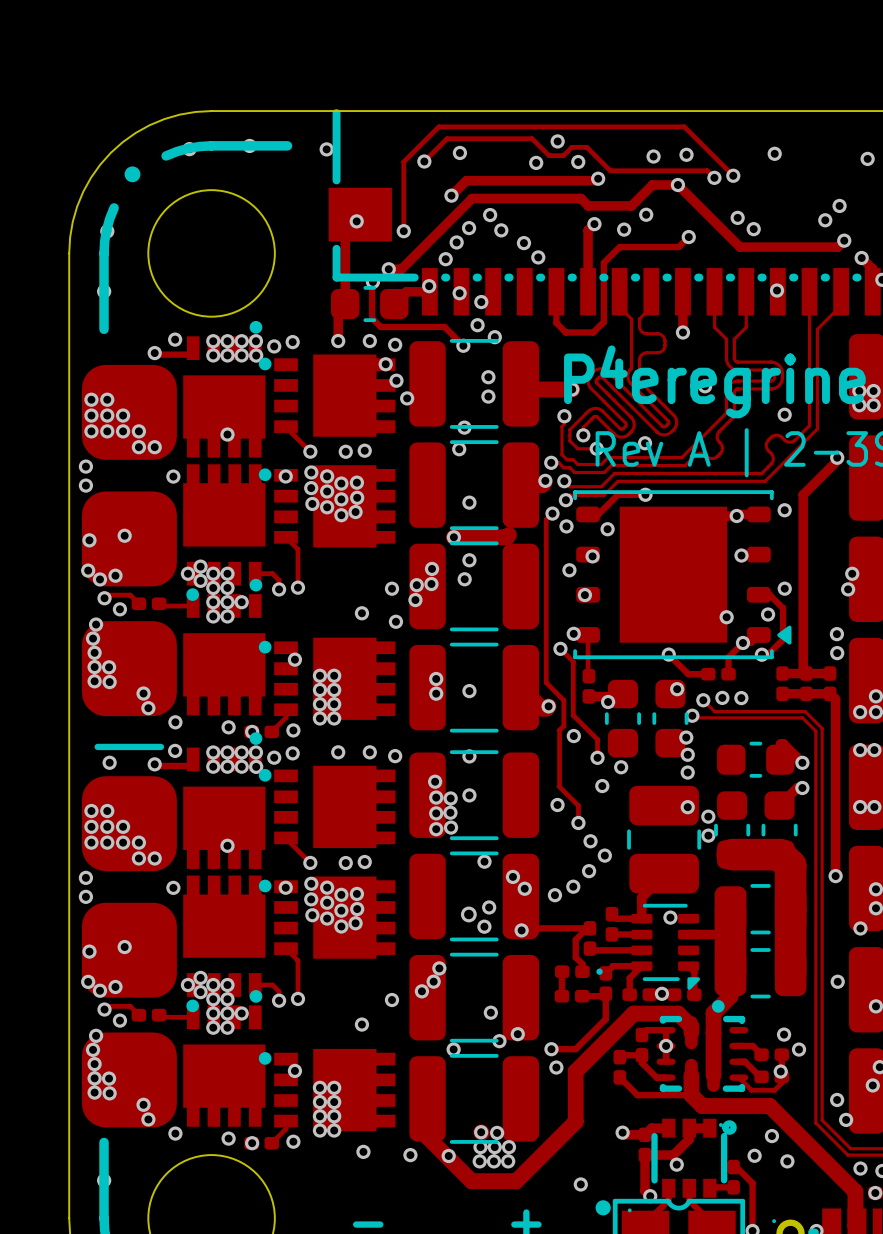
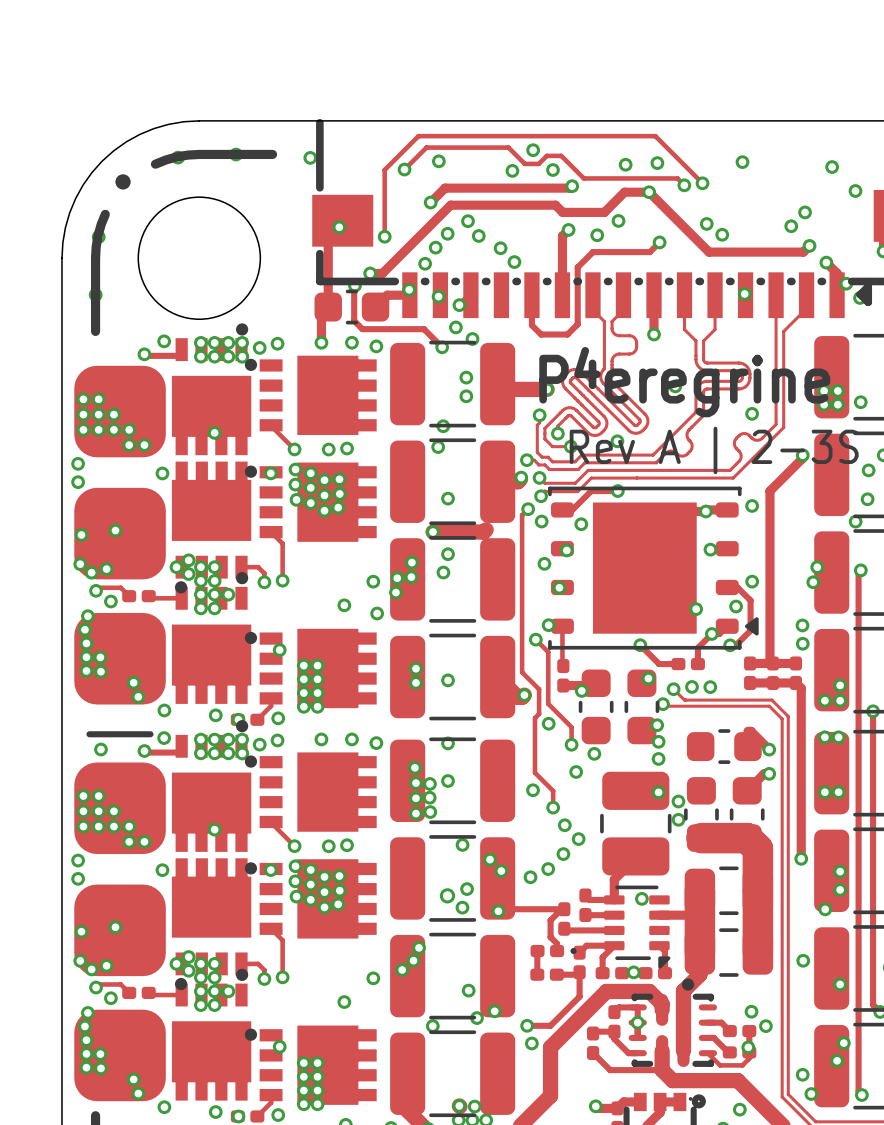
via: (385, 364) -> none
via: (396, 380) -> none
via: (407, 398) -> none

